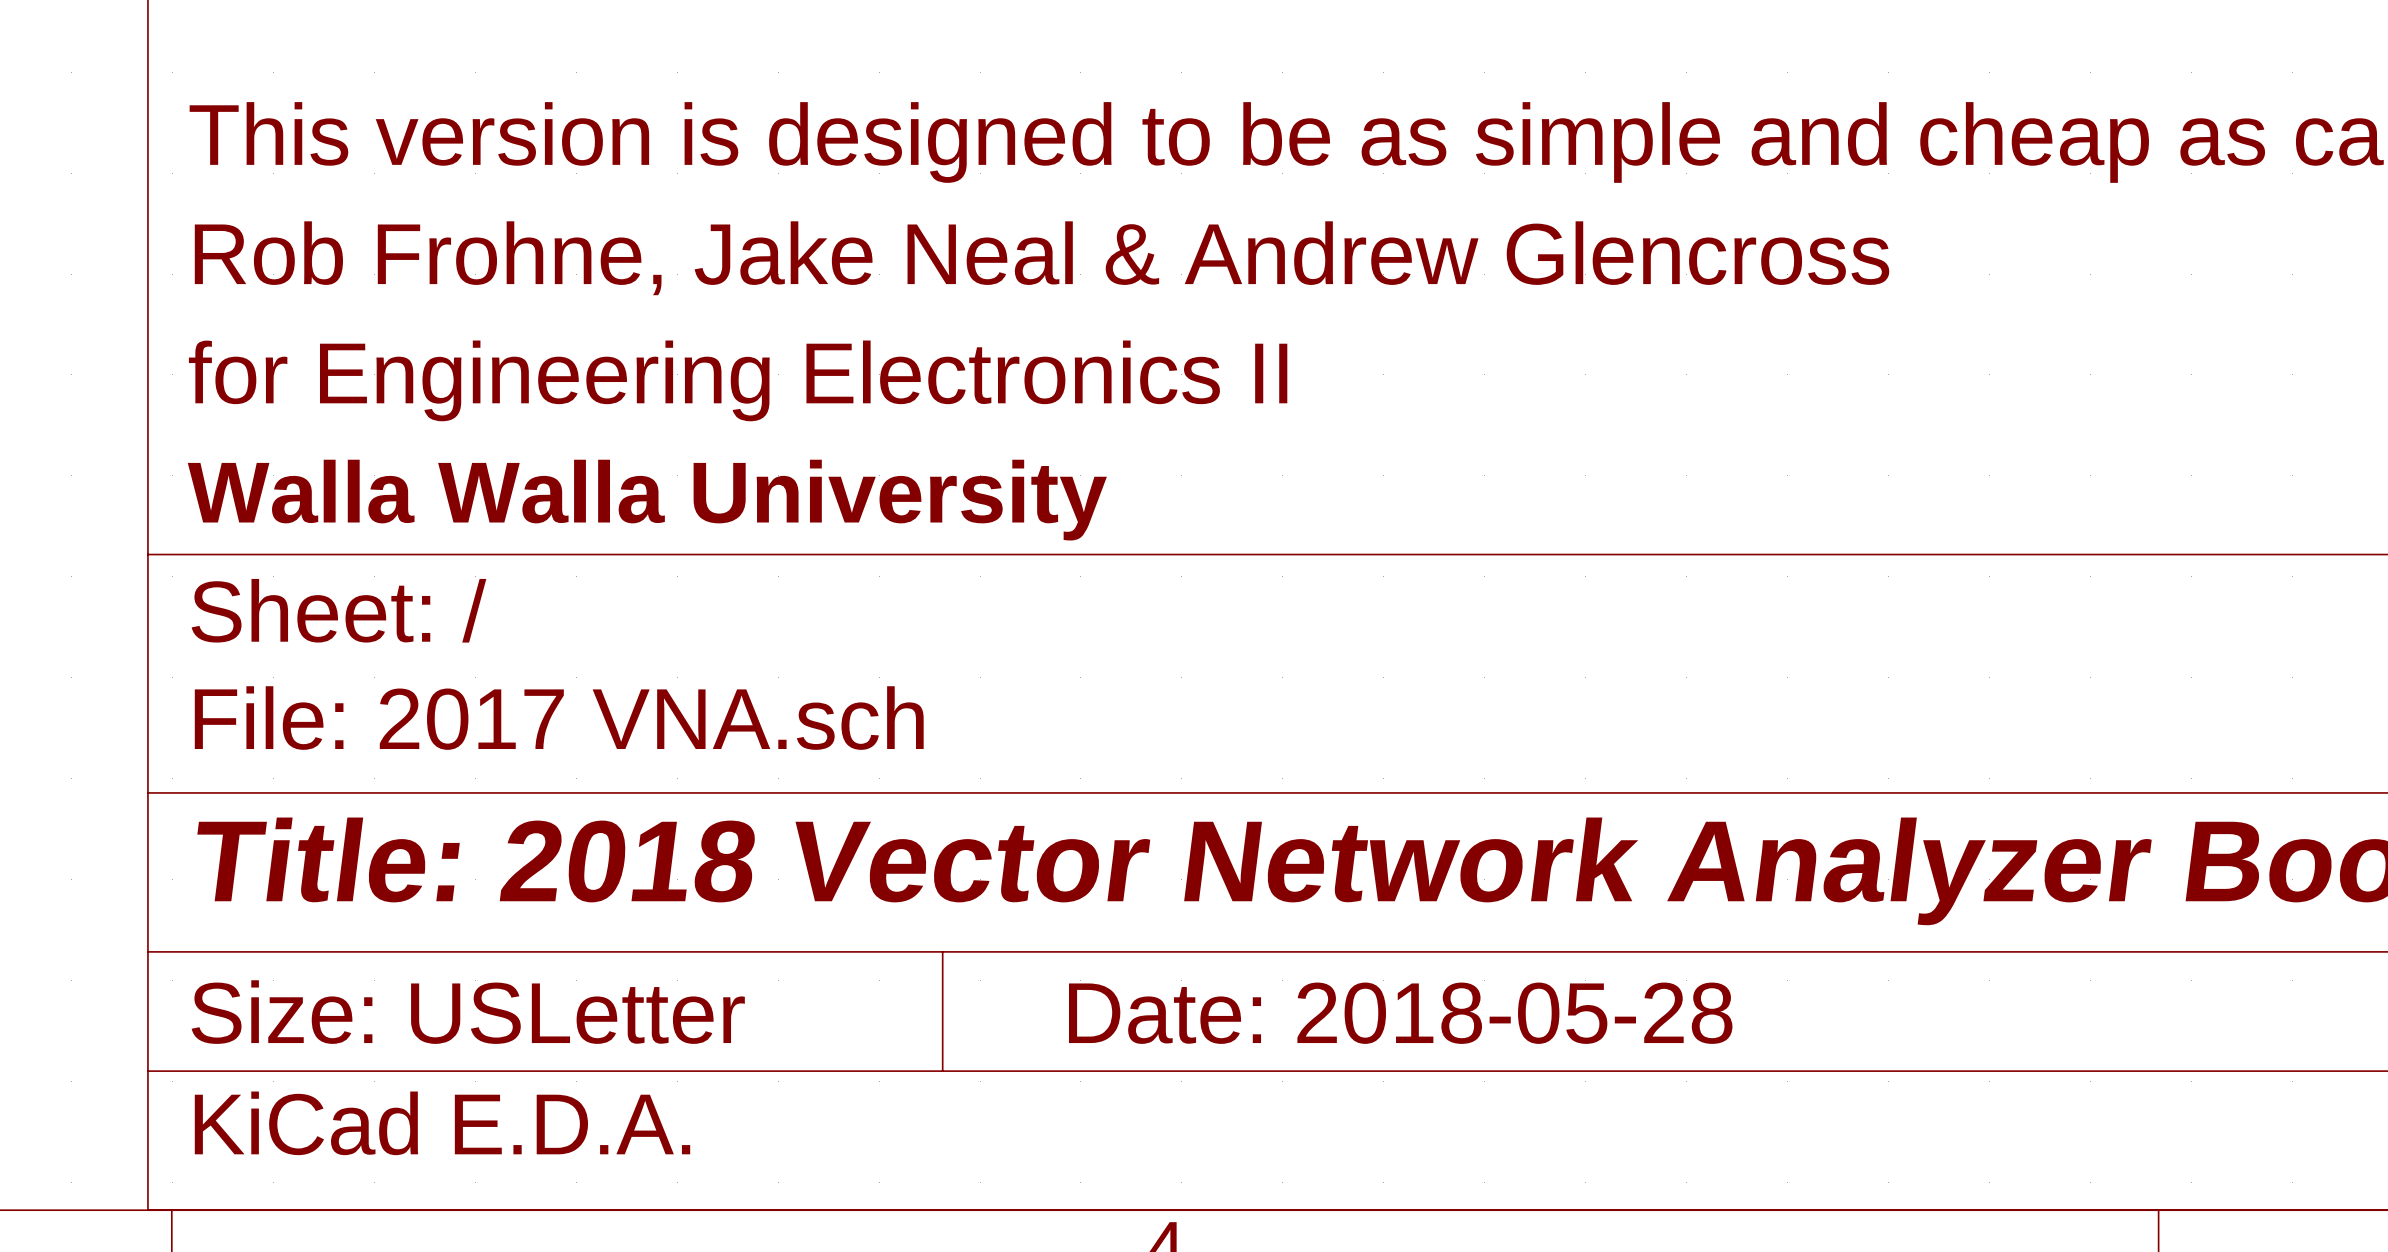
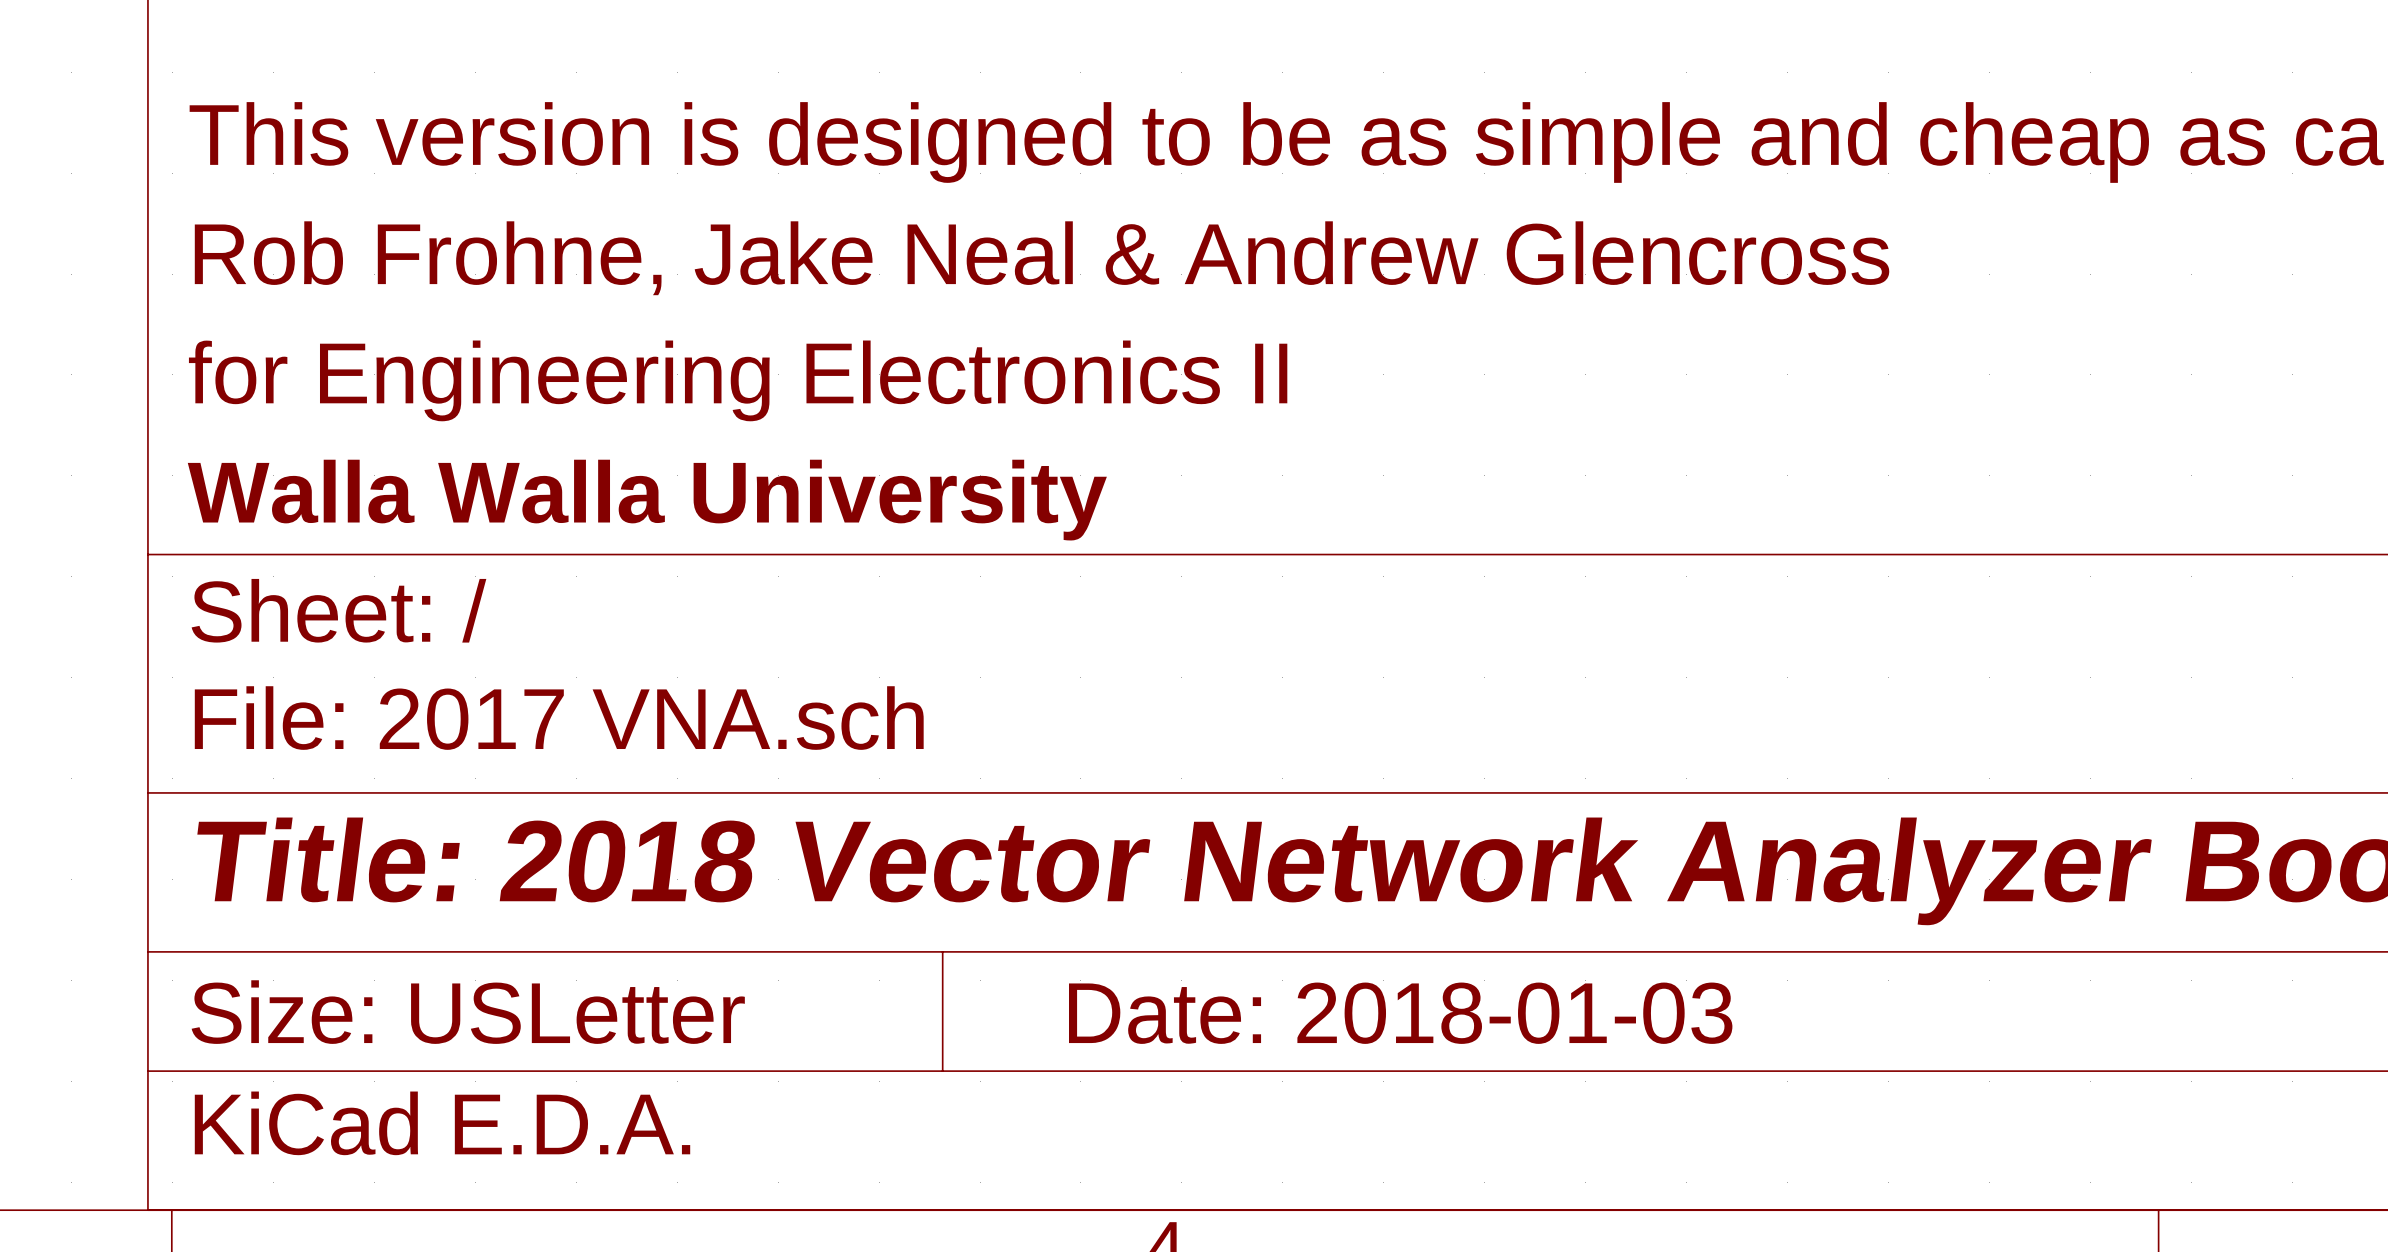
title block: Date: 2018-05-28 (1400, 1013) -> Date: 2018-01-03 (1400, 1013)

